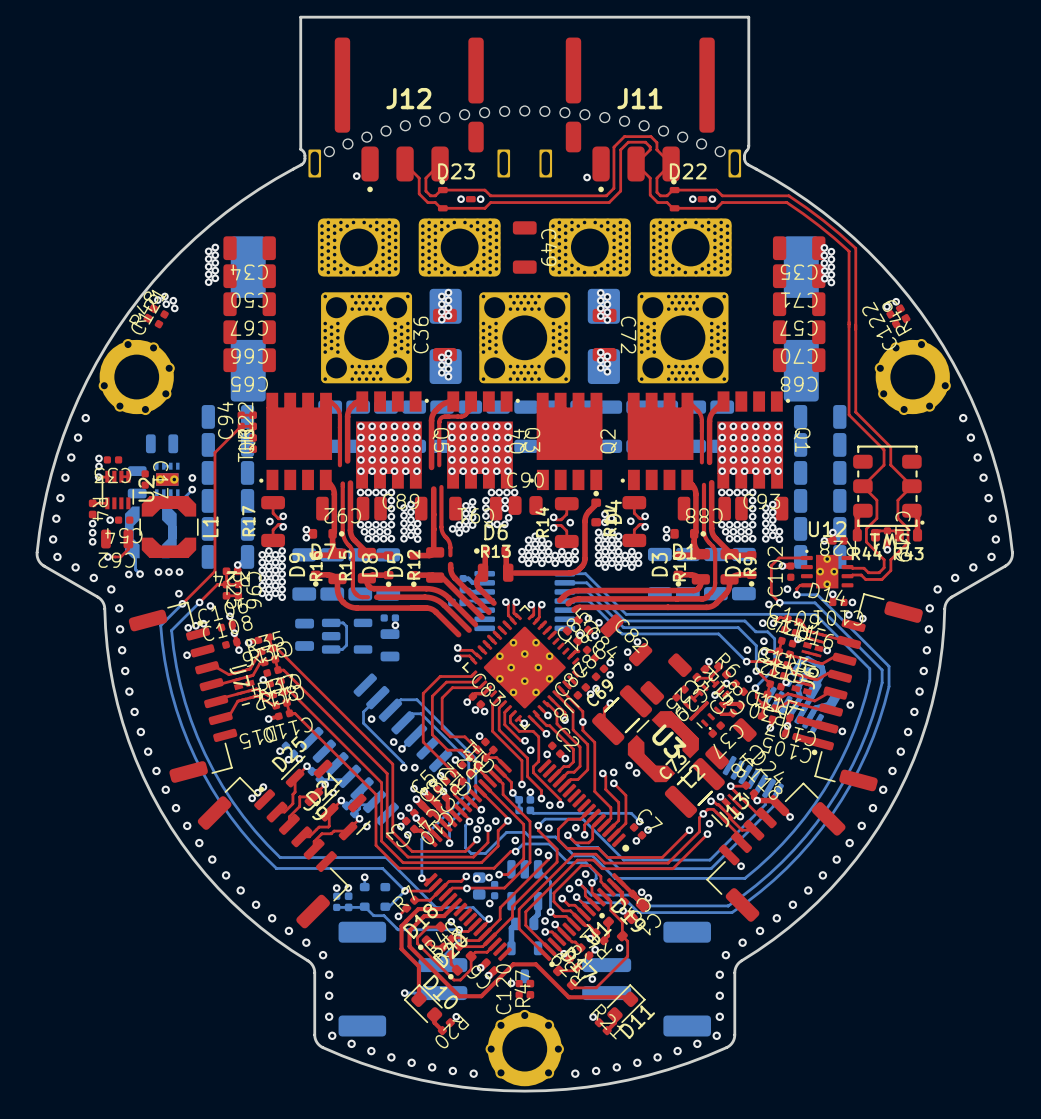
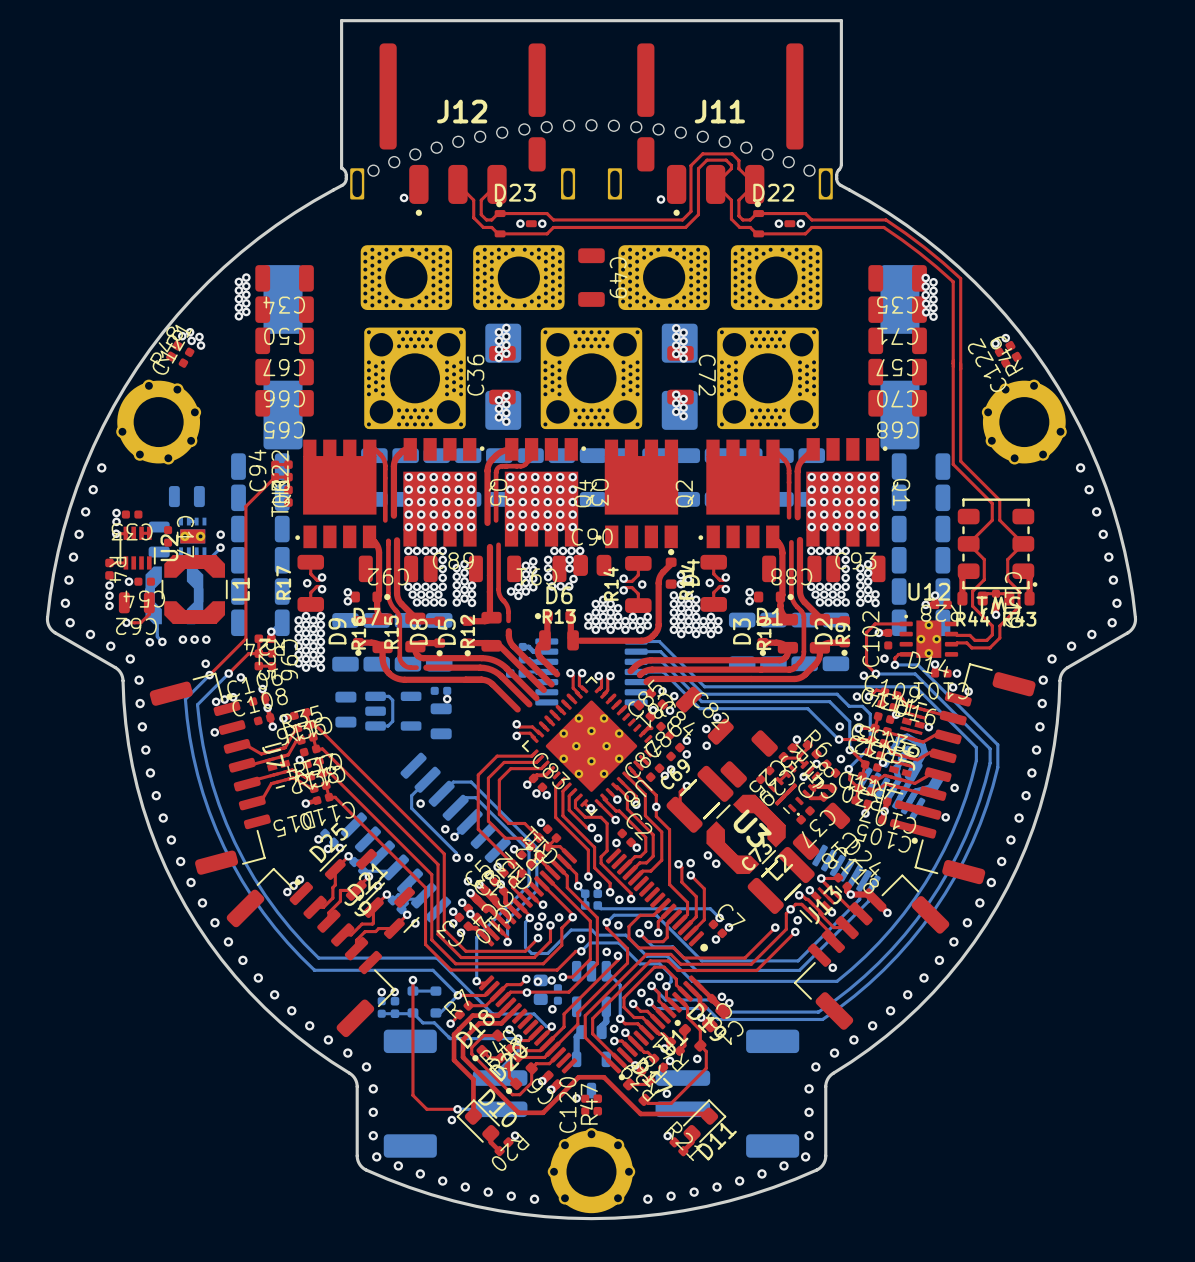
top track: none -> (412, 980) (412, 1095) (426, 1109) (457, 1109)
bottom track: none -> (413, 991) (435, 991)
via: none -> (451, 1120)

